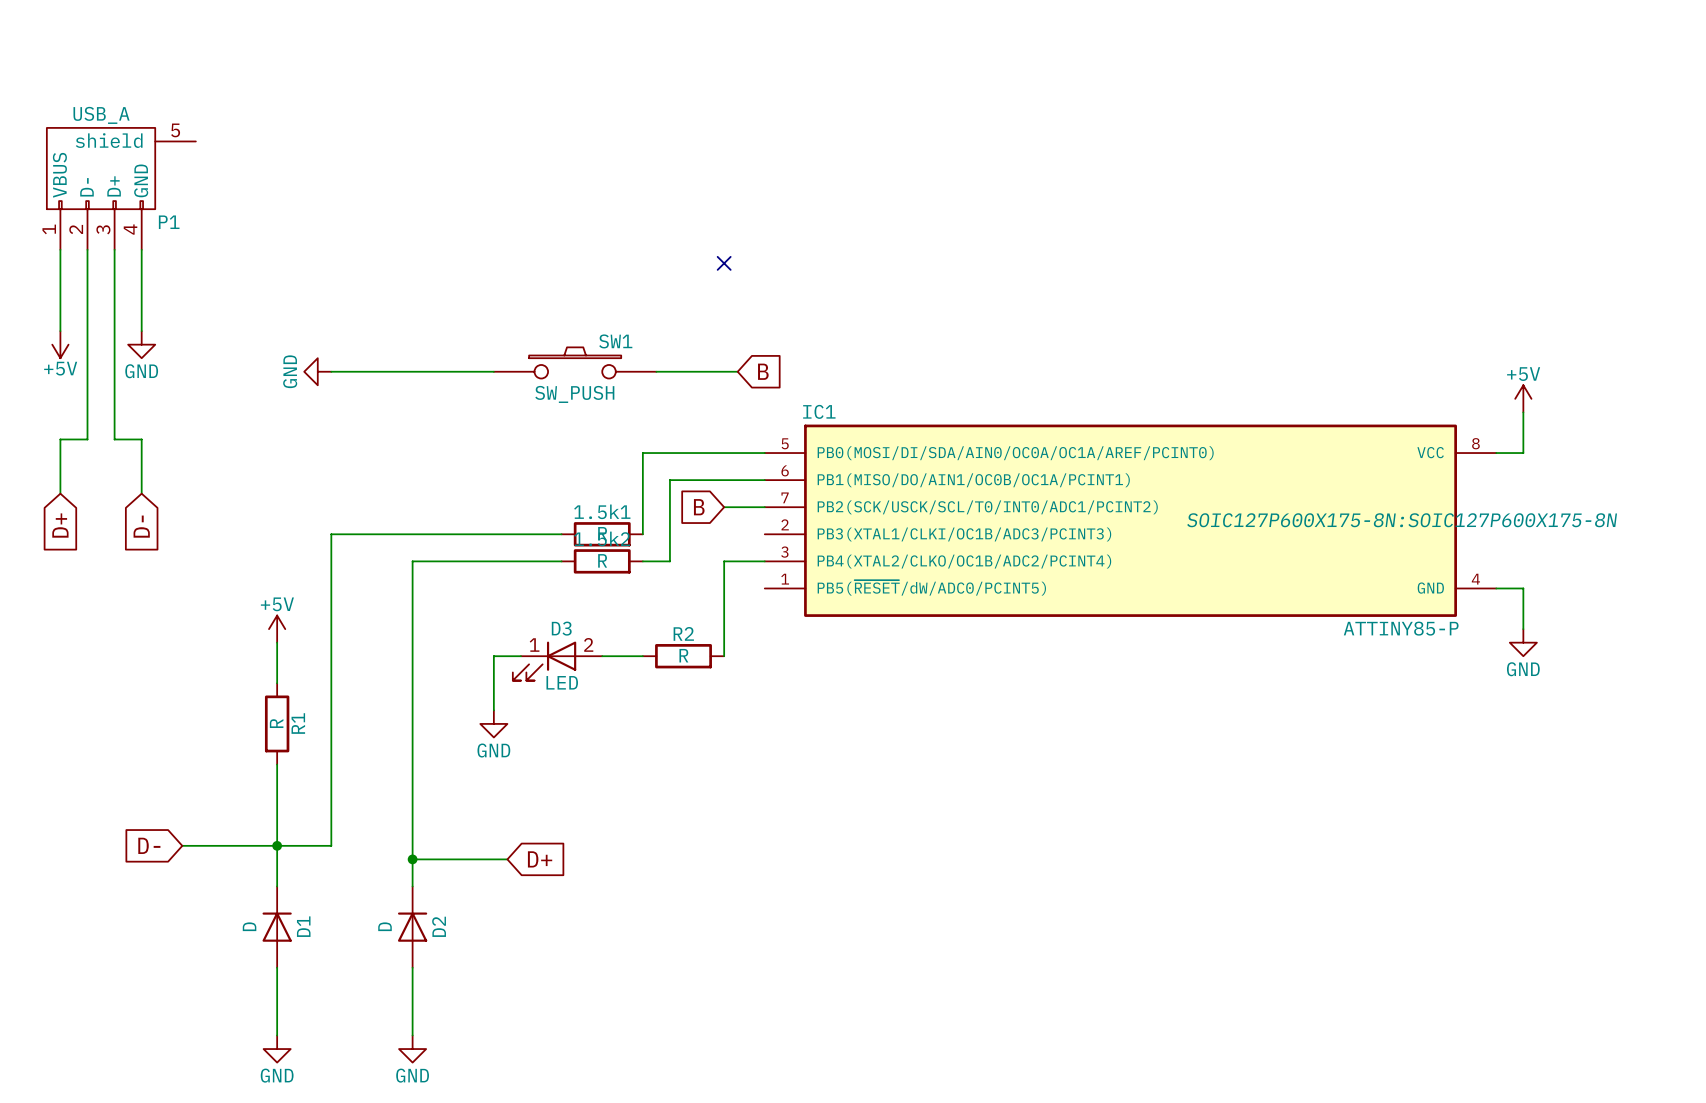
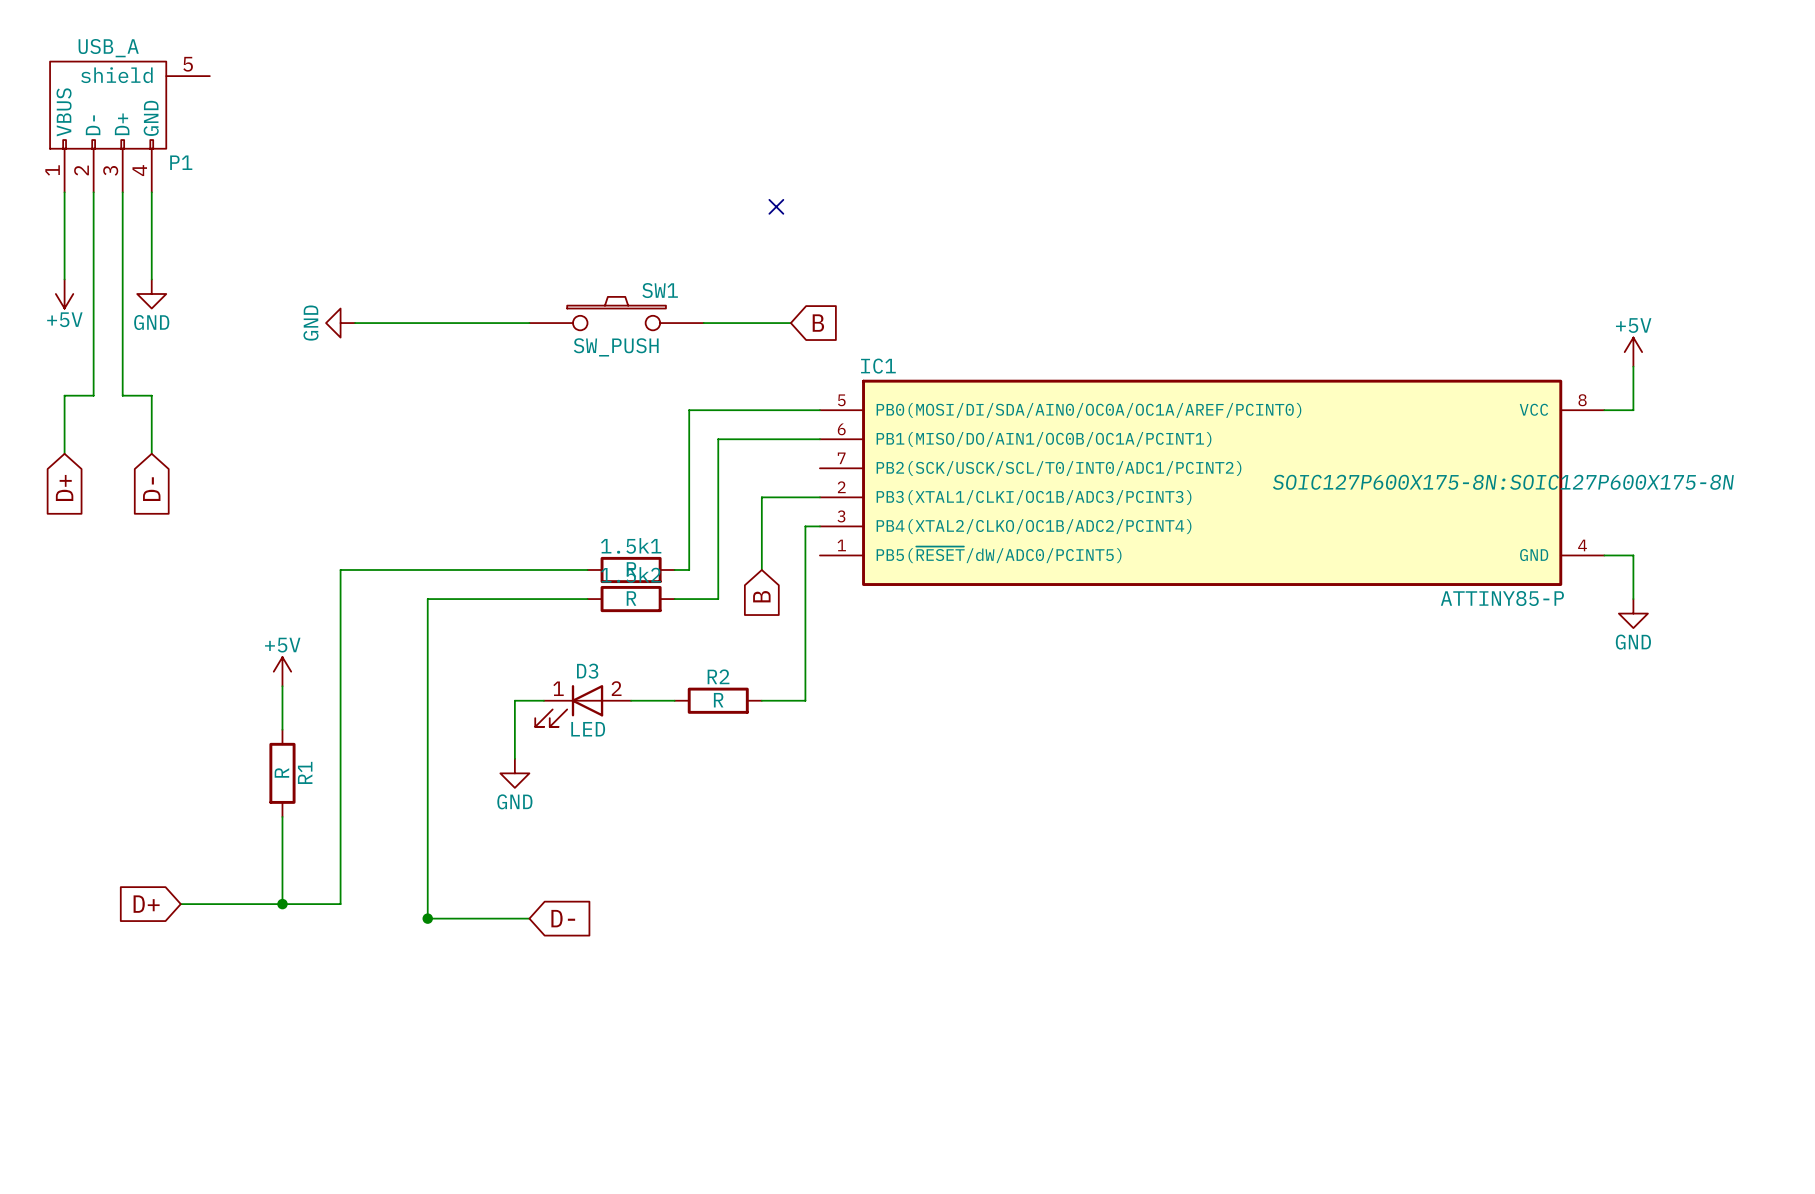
P1 position: (121, 188) -> (129, 126)
no-connect mark: none -> (776, 206)
wire: (60, 249) (60, 331) -> (64, 192) (64, 279)
wire: (87, 249) (87, 439) (60, 439) (60, 493) -> (93, 192) (93, 395) (64, 395) (64, 453)
wire: (114, 249) (114, 439) (141, 439) (141, 493) -> (122, 192) (122, 395) (151, 395) (151, 453)
wire: (141, 249) (141, 331) -> (151, 192) (151, 279)
no-connect mark: (724, 263) -> none
power symbol position: +5V (60, 344) -> +5V (64, 294)
power symbol position: GND (141, 344) -> GND (151, 294)
SW1 position: (575, 362) -> (616, 313)
power symbol position: GND (317, 371) -> GND (340, 323)
wire: (331, 371) (493, 371) -> (355, 323) (529, 323)
wire: (656, 371) (737, 371) -> (703, 323) (790, 323)
global label position: B (763, 371) -> B (818, 323)
power symbol position: +5V (1523, 398) -> +5V (1633, 352)
wire: (1523, 412) (1523, 453) (1496, 453) -> (1633, 366) (1633, 410) (1604, 410)
wire: (764, 453) (642, 453) (642, 534) -> (819, 410) (689, 410) (689, 569) (674, 569)
wire: none -> (819, 497) (761, 497) (761, 569)
wire: (764, 480) (669, 480) (669, 561) -> (819, 439) (718, 439) (718, 599) (703, 599)
global label rotation: 0° (699, 507) -> 90° counterclockwise (761, 596)
global label position: B (699, 507) -> B (761, 596)
wire: (724, 507) (764, 507) -> none
IC1 position: (1130, 520) -> (1212, 482)
global label position: D+ (60, 525) -> D+ (64, 487)
global label position: D- (141, 526) -> D- (151, 489)
wire: (764, 561) (724, 561) (724, 656) -> (819, 526) (805, 526) (805, 700) (761, 700)
wire: (1496, 588) (1523, 588) (1523, 629) -> (1604, 555) (1633, 555) (1633, 599)
power symbol position: GND (1523, 642) -> GND (1633, 613)
global label: D- (149, 845) -> D+ (146, 904)
wire: (277, 845) (277, 886) -> none
wire: (412, 859) (412, 886) -> none
global label: D+ (540, 859) -> D- (563, 918)
D1: D (277, 927) -> none
D2: D (412, 927) -> none
wire: (277, 967) (277, 1035) -> none
wire: (412, 967) (412, 1035) -> none
power symbol: GND (277, 1049) -> none
power symbol: GND (412, 1049) -> none

